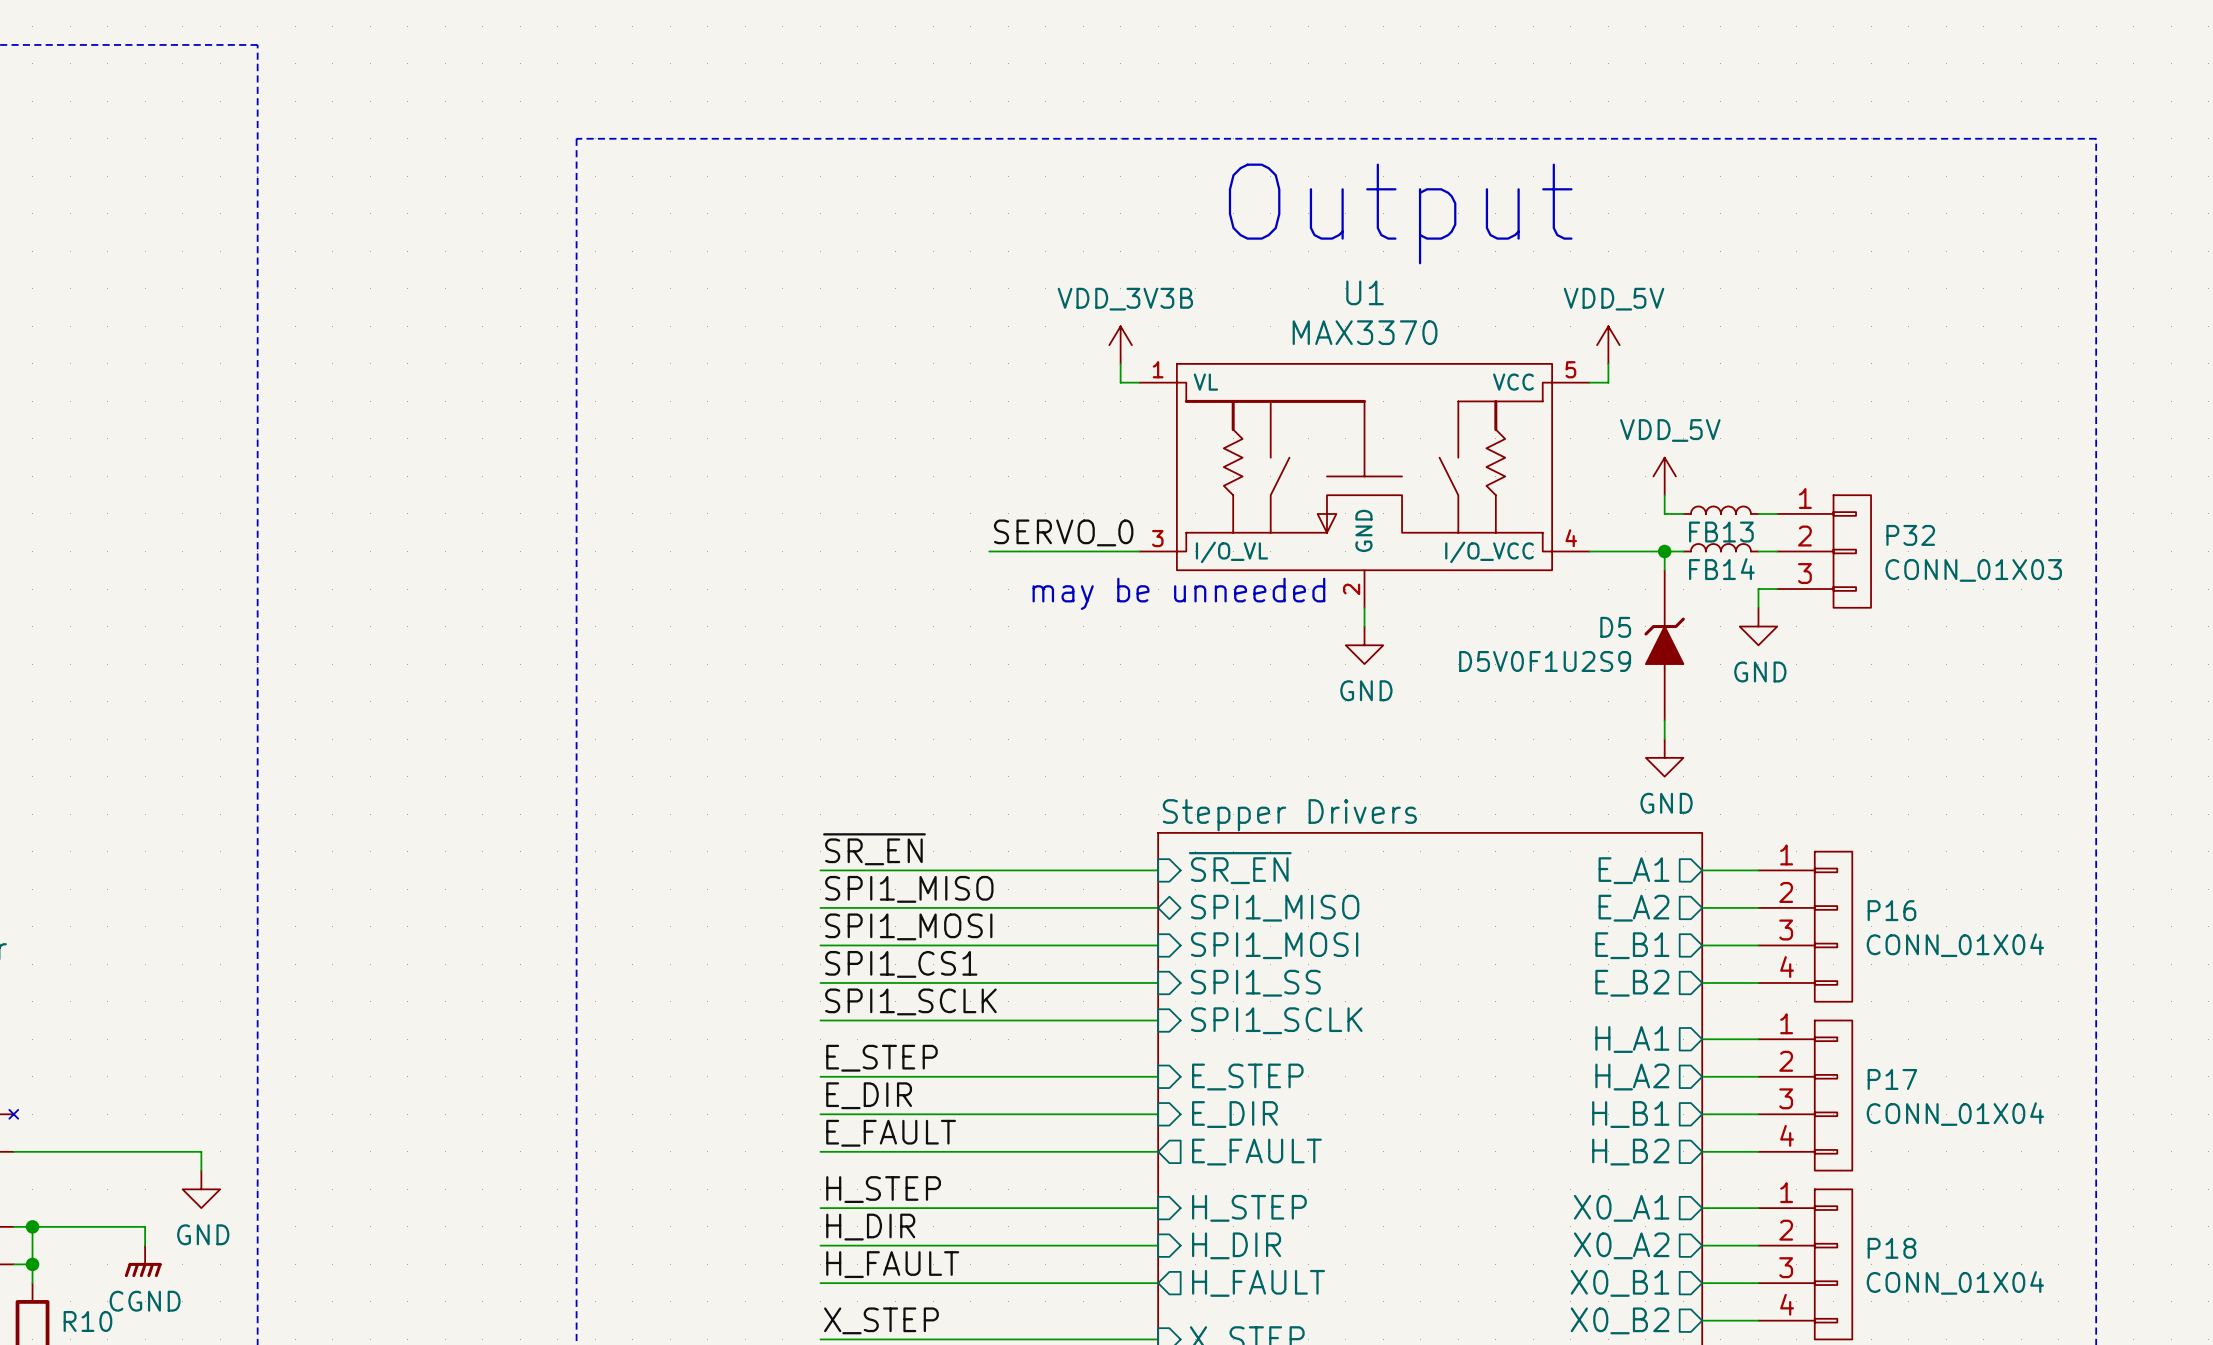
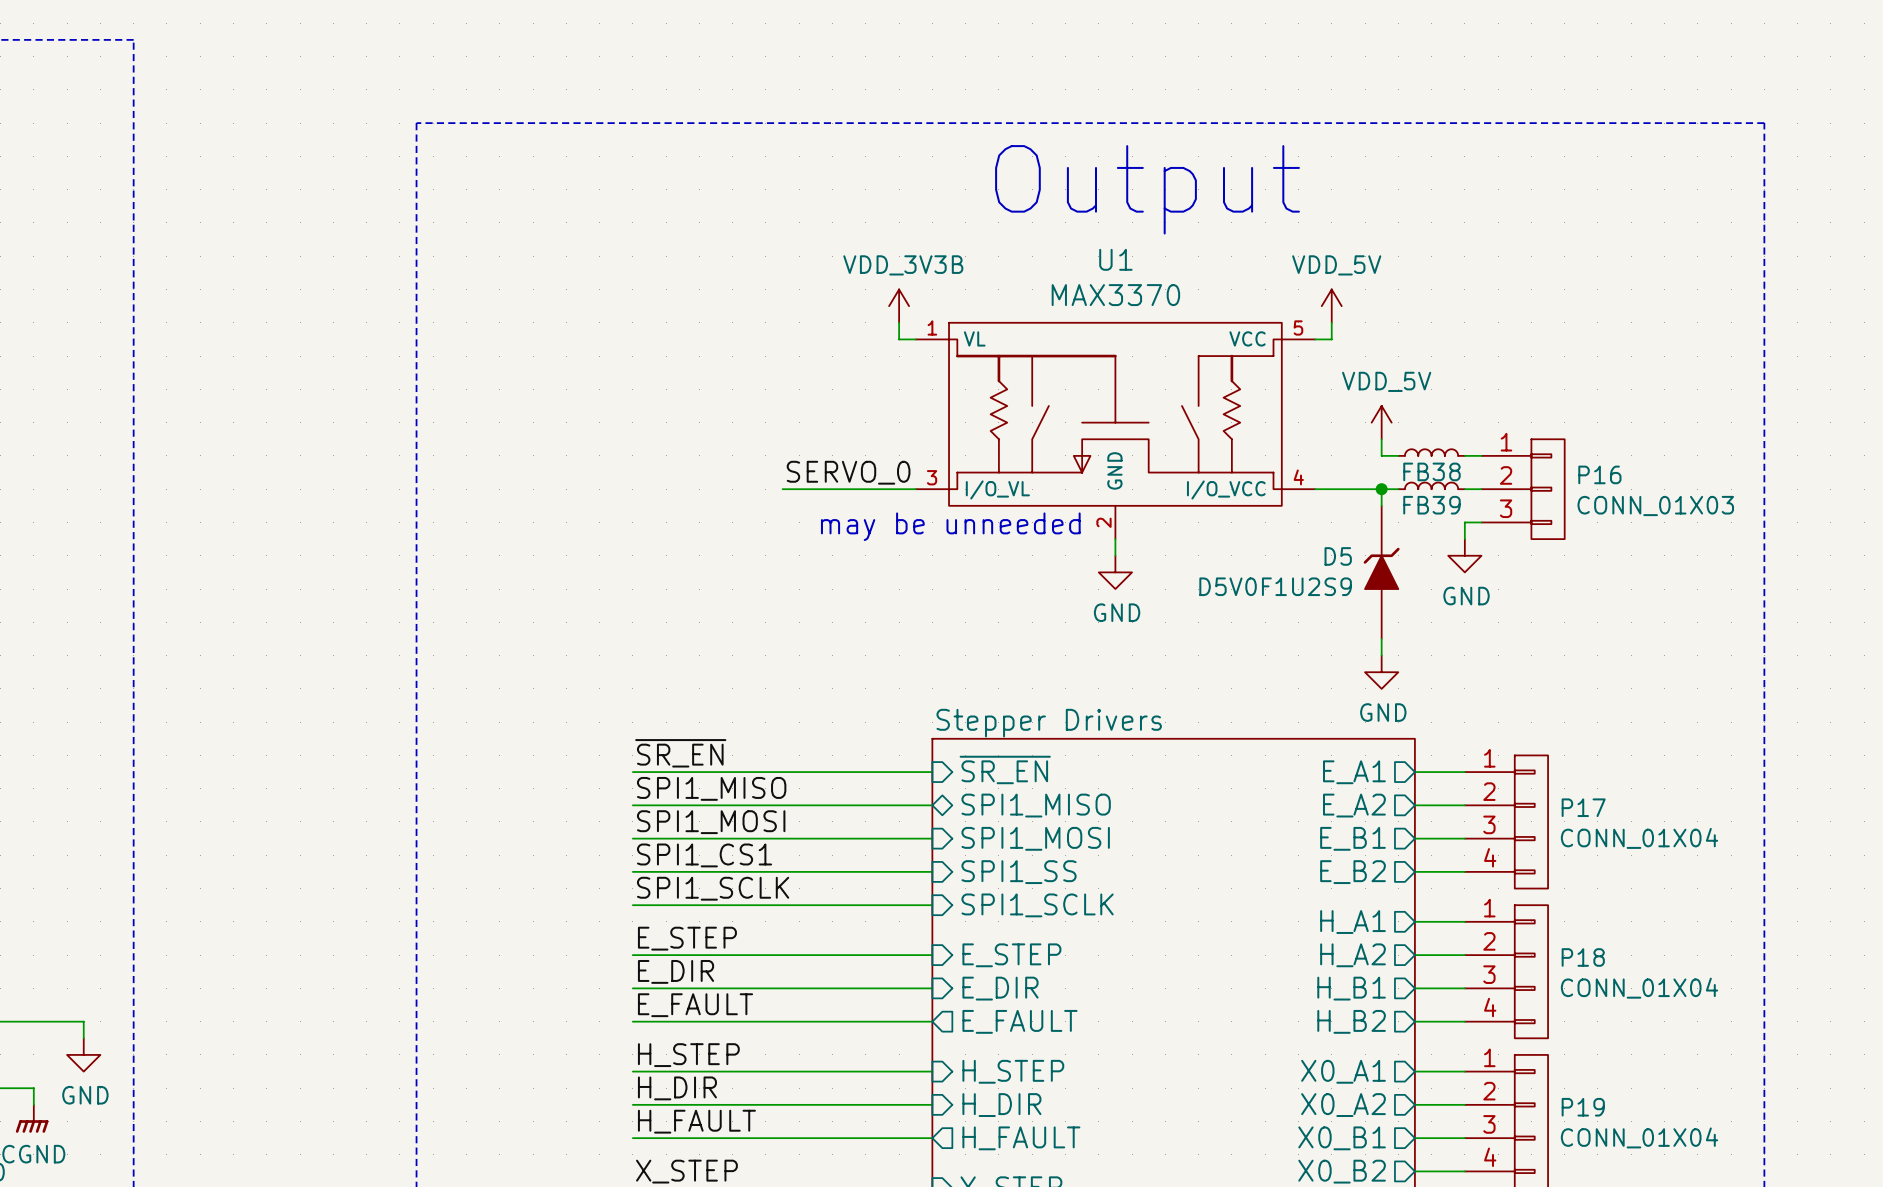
FB13 name: FB13 (1721, 532) -> FB38 (1431, 471)
P32 name: P32 (1910, 535) -> P16 (1599, 474)
FB14 name: FB14 (1721, 569) -> FB39 (1431, 505)
P16 name: P16 (1891, 910) -> P17 (1583, 807)
P17 name: P17 (1892, 1079) -> P18 (1583, 957)
P18 name: P18 (1891, 1248) -> P19 (1583, 1107)

